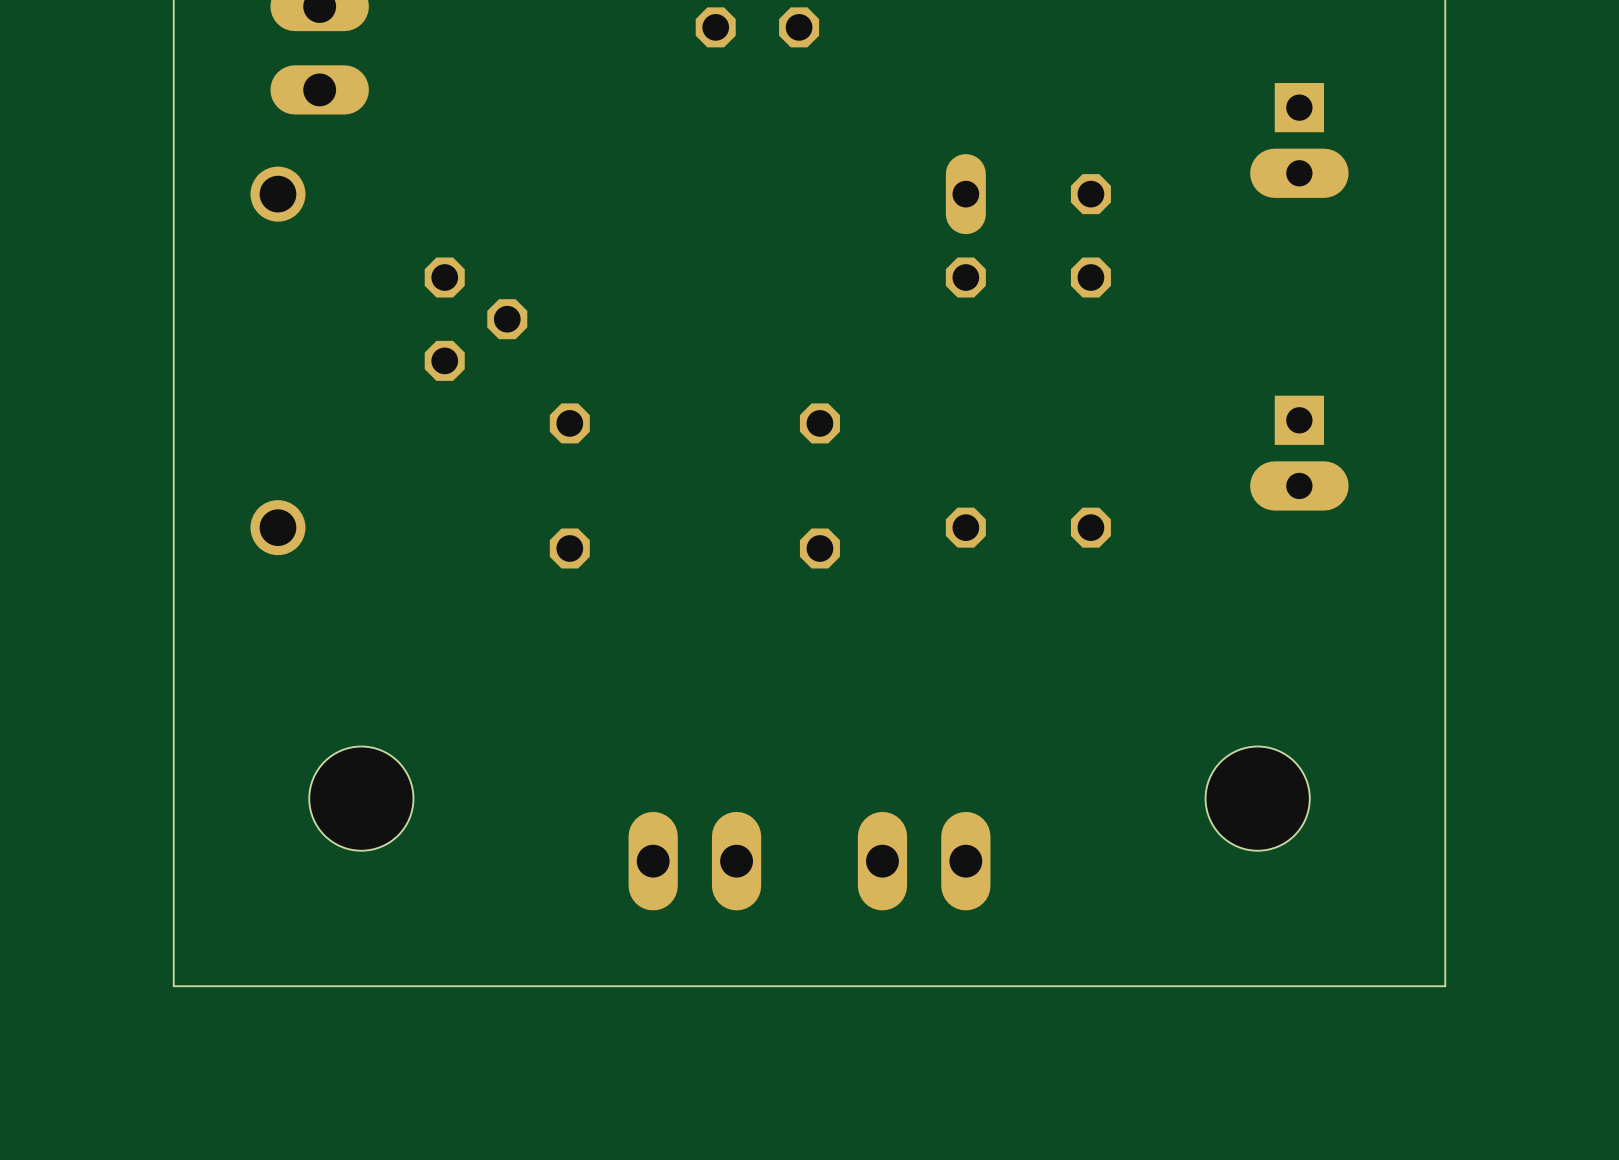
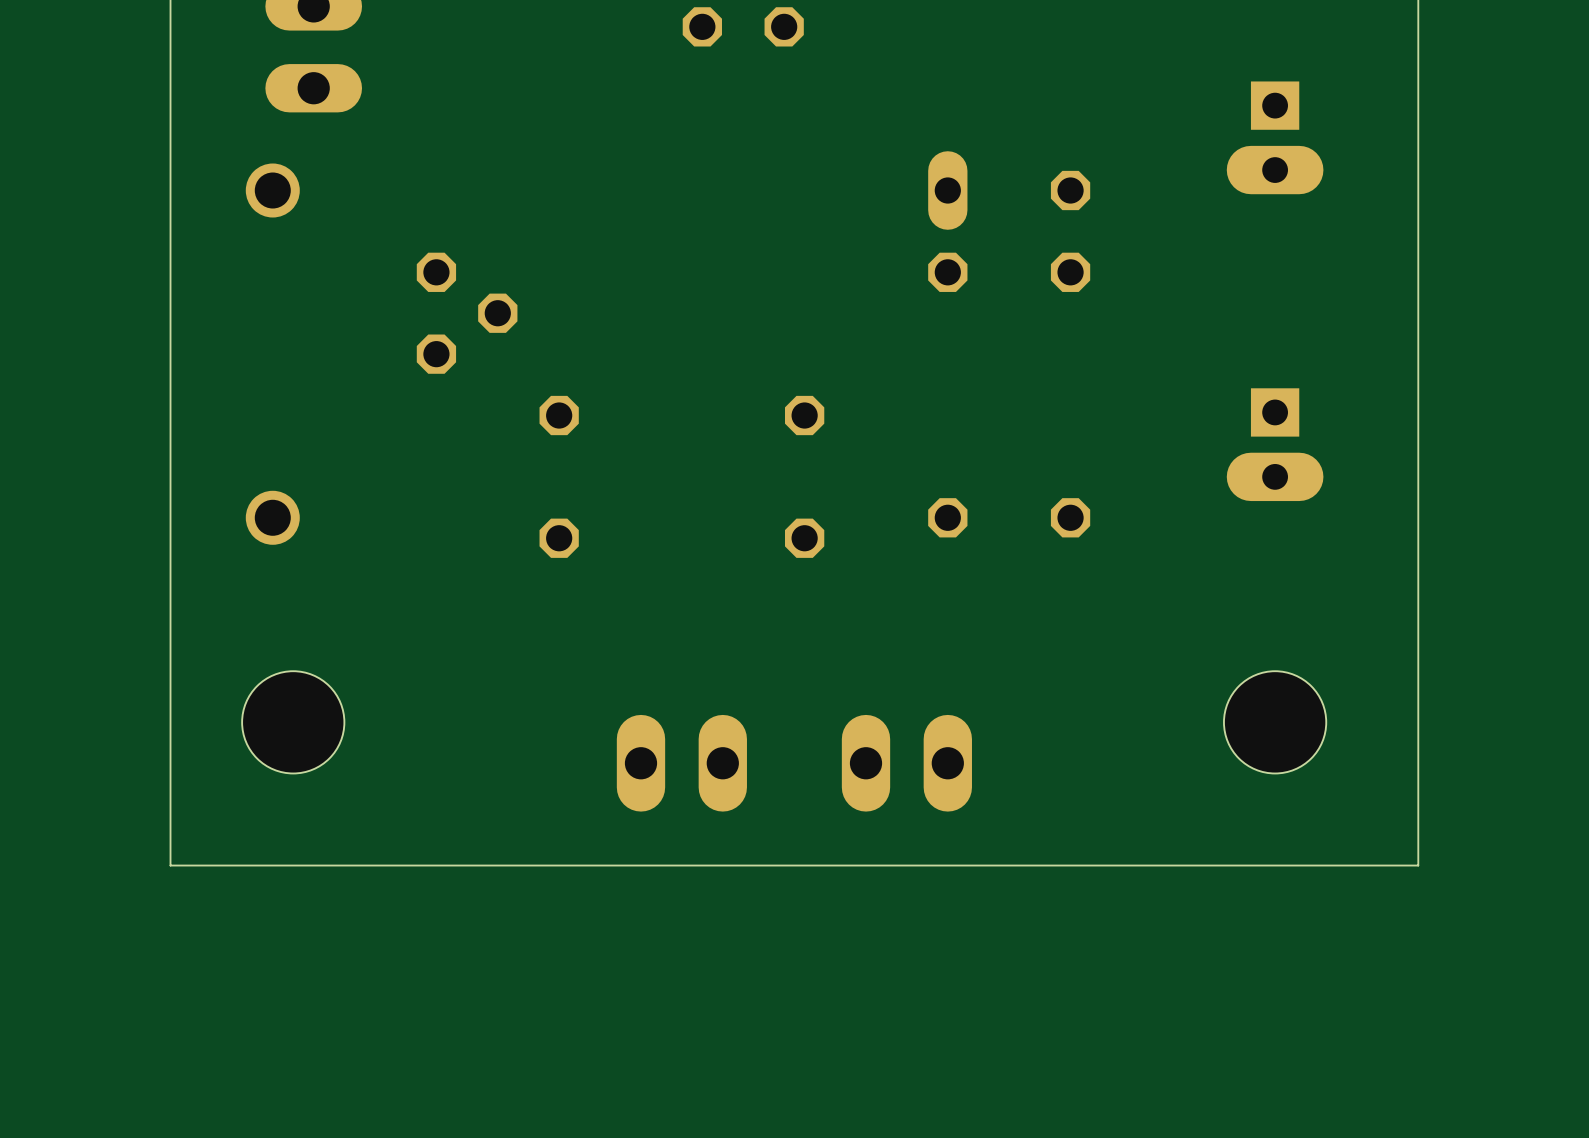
hole position: (361, 798) -> (293, 722)
hole position: (1257, 798) -> (1275, 722)
part position: (694, 861) -> (681, 763)
part position: (924, 861) -> (906, 763)
board edge: (1445, 882) (1445, 986) (173, 986) (173, 882) -> (1418, 865) (170, 865)

